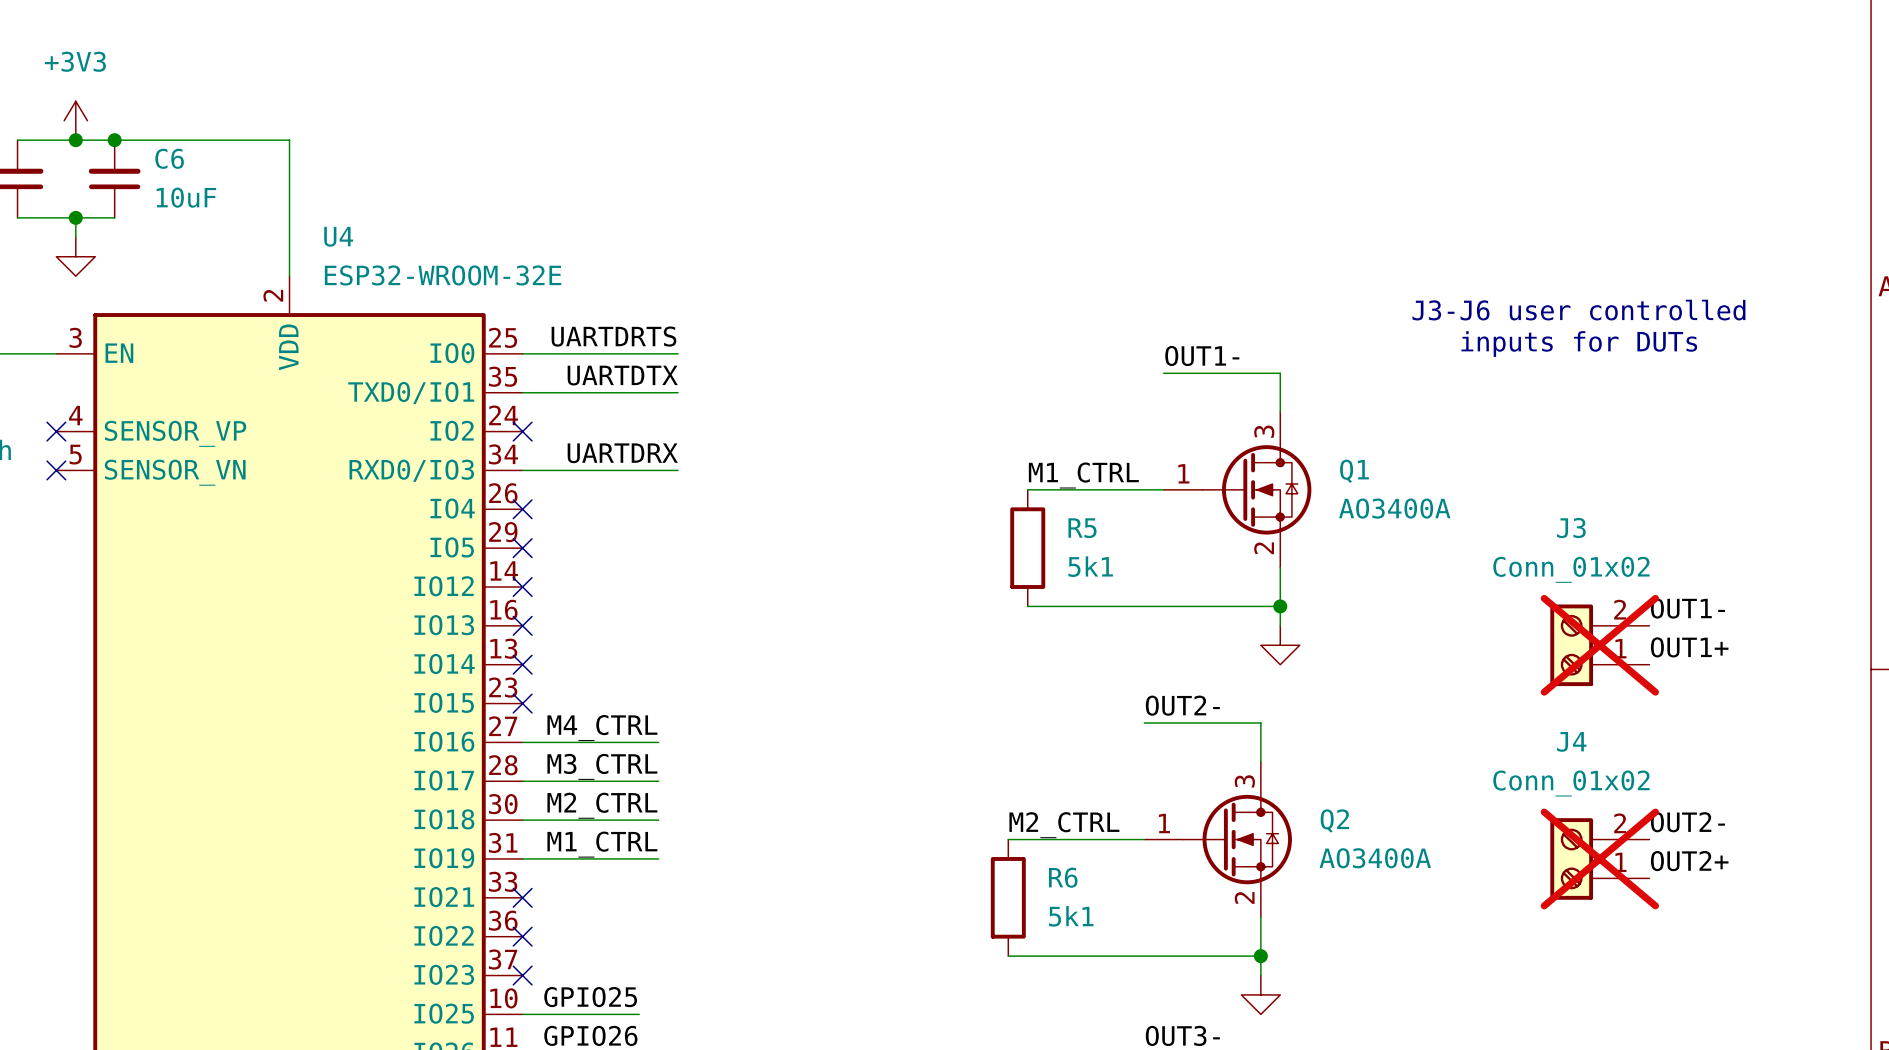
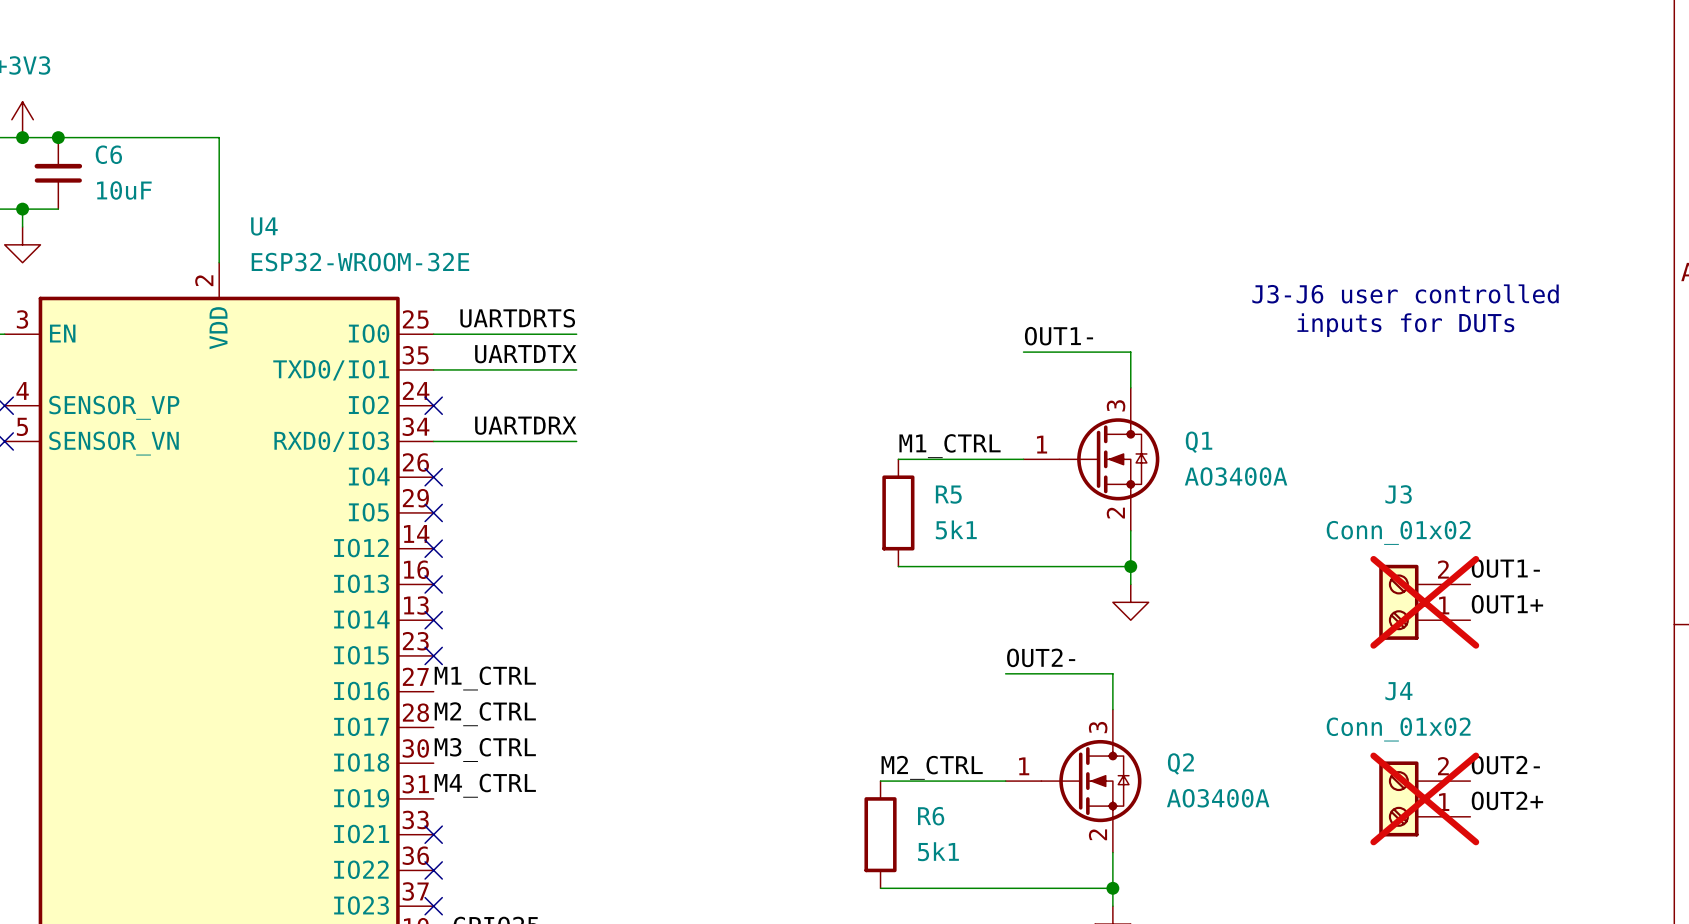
label position: M4_CTRL (602, 728) -> M4_CTRL (485, 785)
wire: (522, 742) (658, 742) -> none
label position: M3_CTRL (602, 766) -> M3_CTRL (485, 749)
wire: (522, 781) (658, 781) -> none
label position: M2_CTRL (602, 805) -> M2_CTRL (485, 714)
wire: (522, 820) (658, 820) -> none
label position: M1_CTRL (602, 844) -> M1_CTRL (485, 678)
wire: (522, 858) (658, 858) -> none

